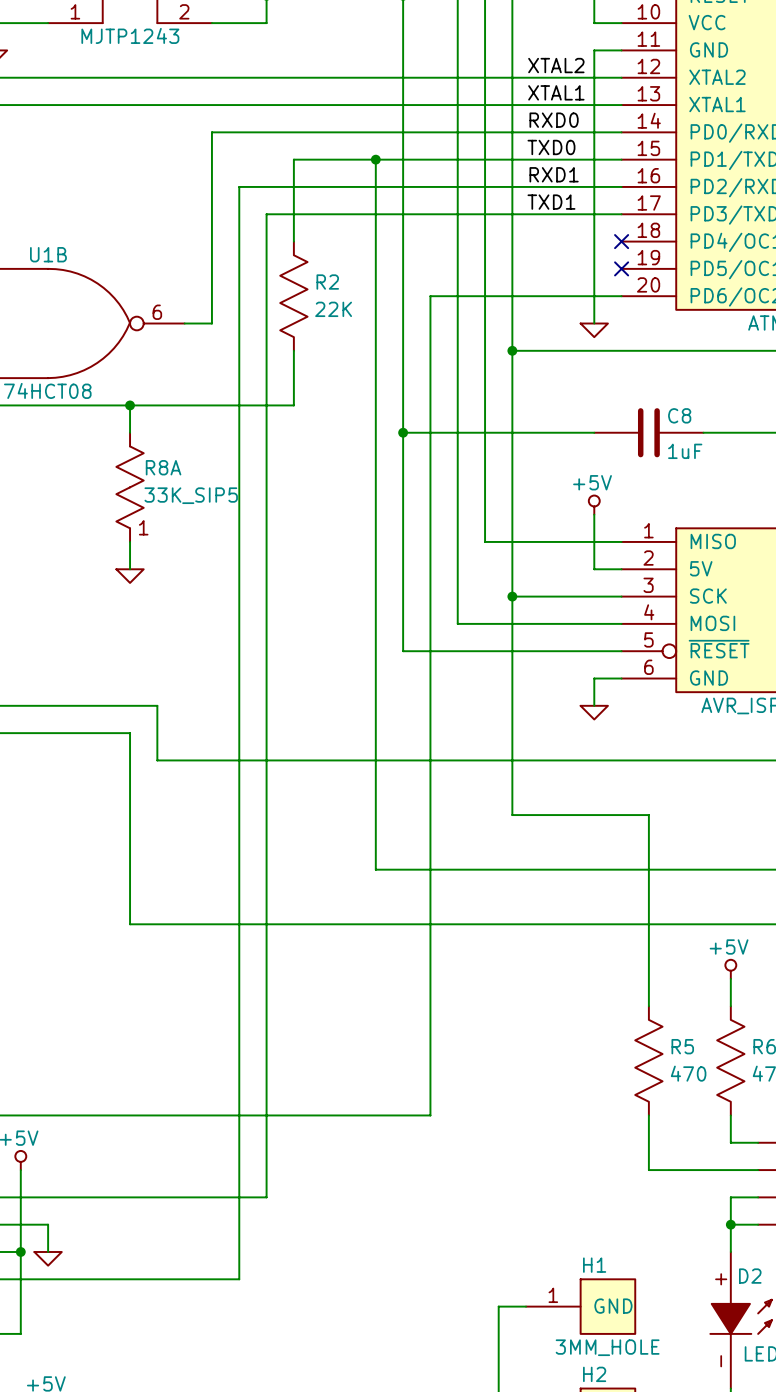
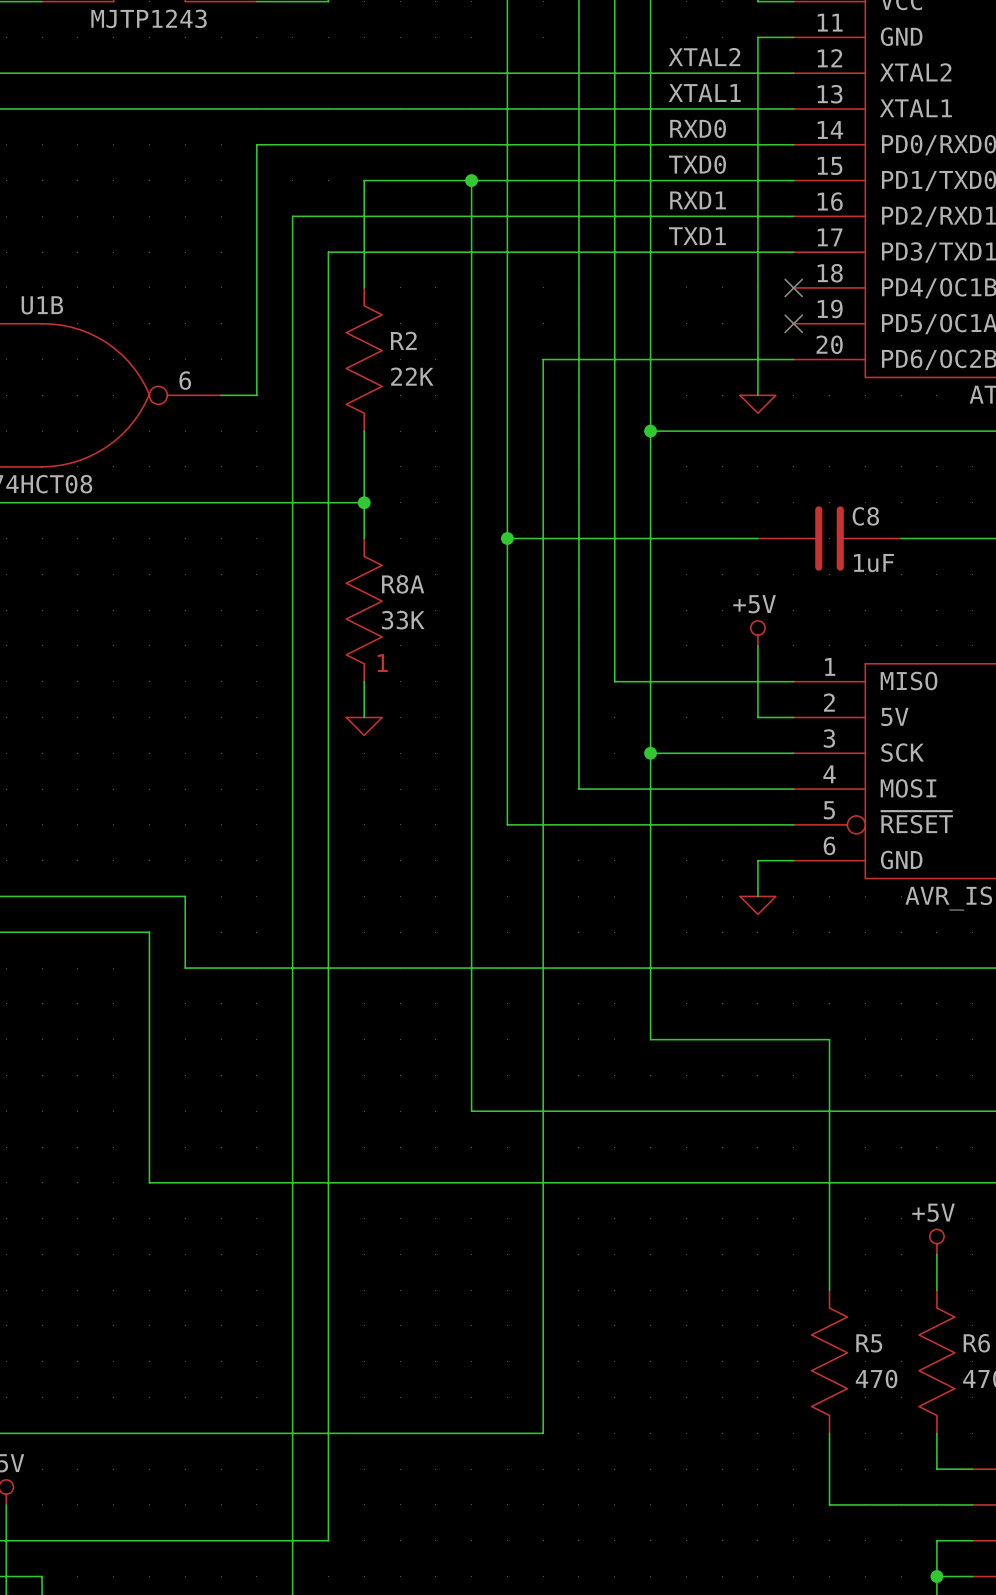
wire: (130, 405) (130, 432) -> (364, 502) (364, 538)
junction: (130, 405) -> none
junction: none -> (364, 502)
R8A position: (130, 487) -> (364, 610)
R8A value: 33K_SIP5 (191, 495) -> 33K (403, 620)
wire: (130, 541) (130, 569) -> (364, 681) (364, 717)
power symbol position: (130, 576) -> (364, 726)

